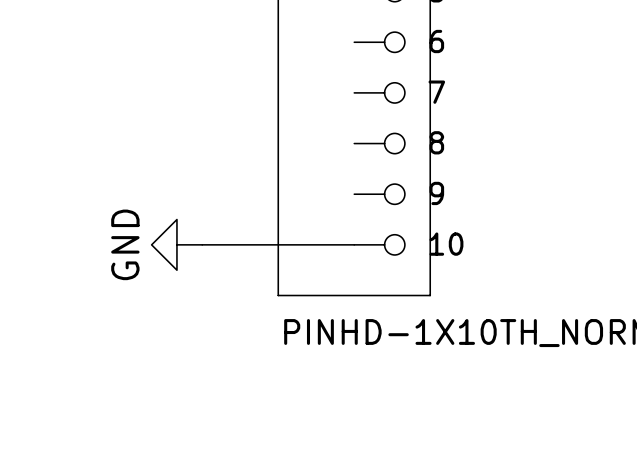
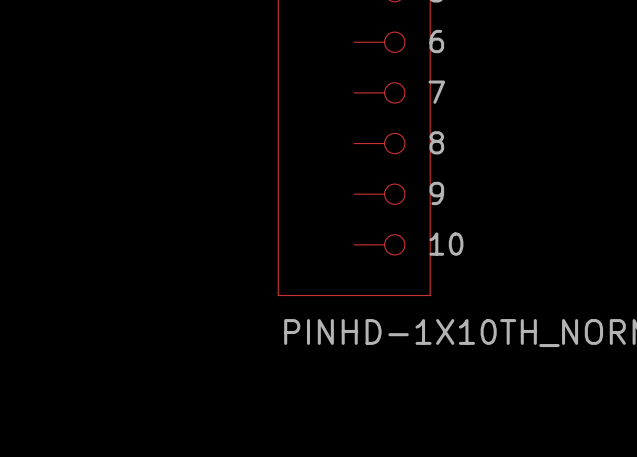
power symbol: GND (176, 244) -> none
wire: (202, 244) (354, 244) -> none

